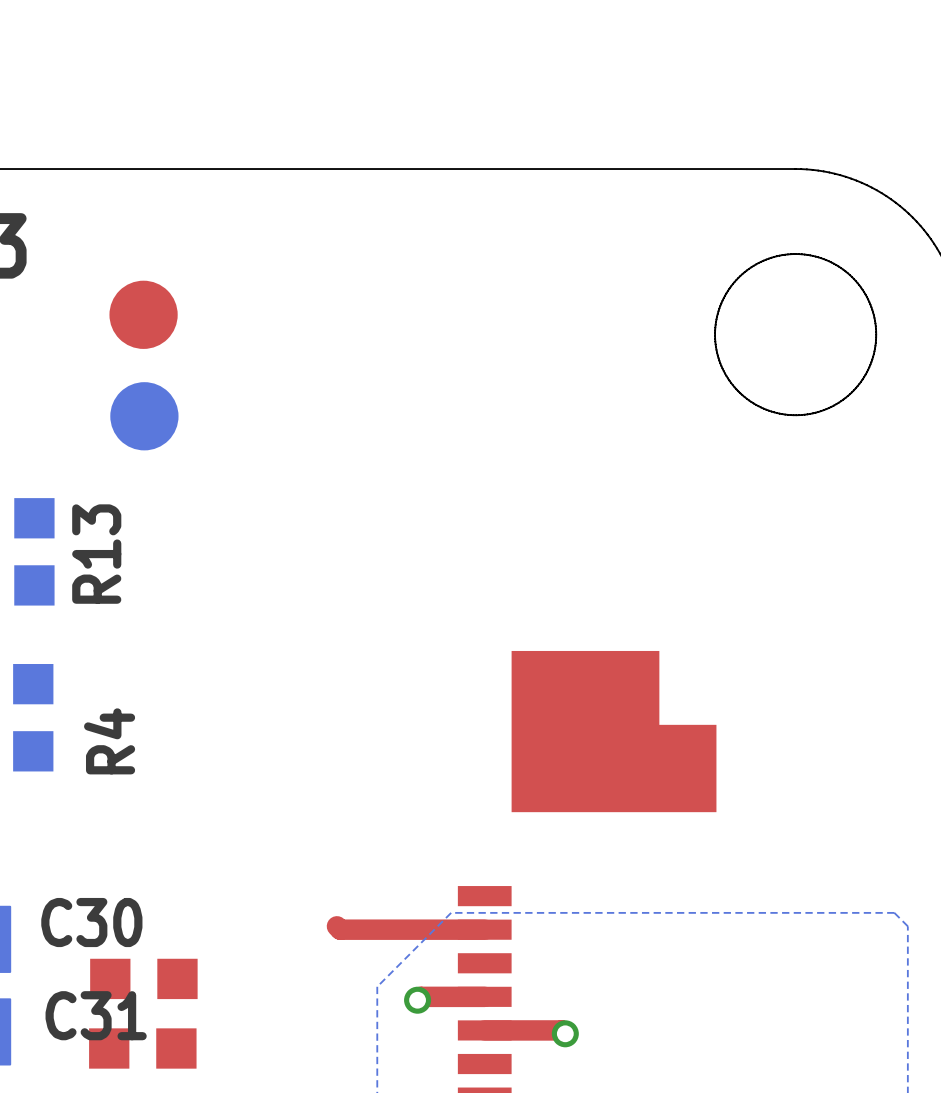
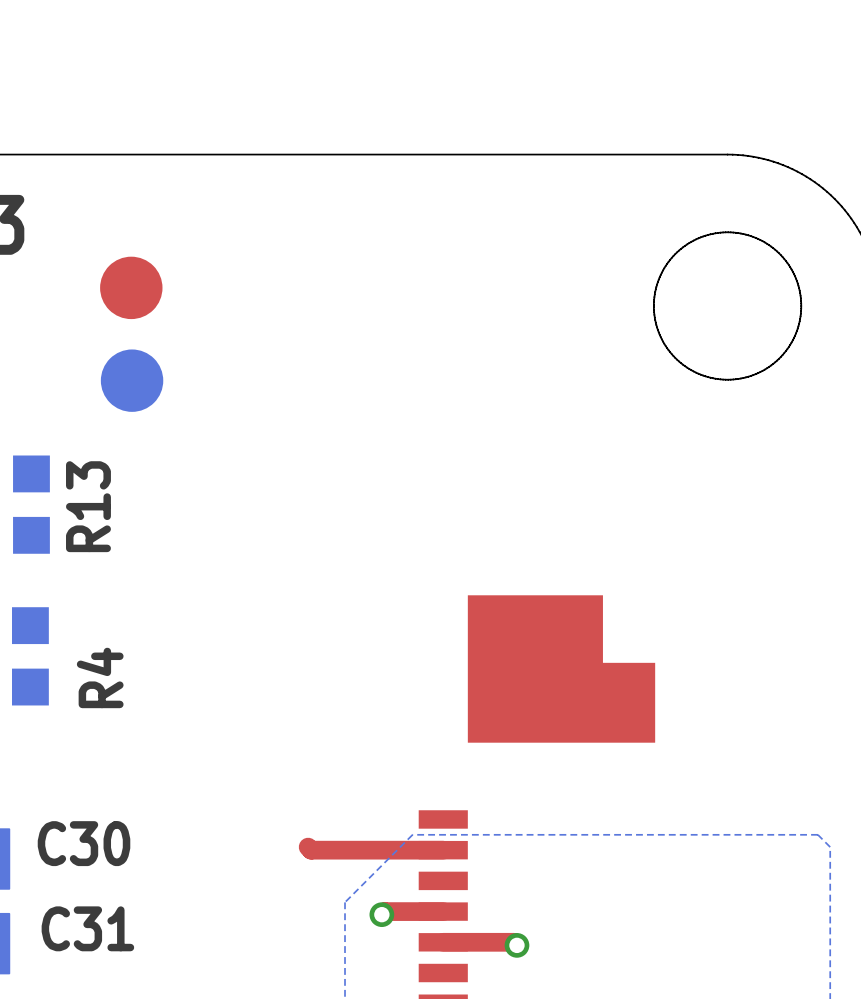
part: (143, 978) -> none
part: (142, 1048) -> none

